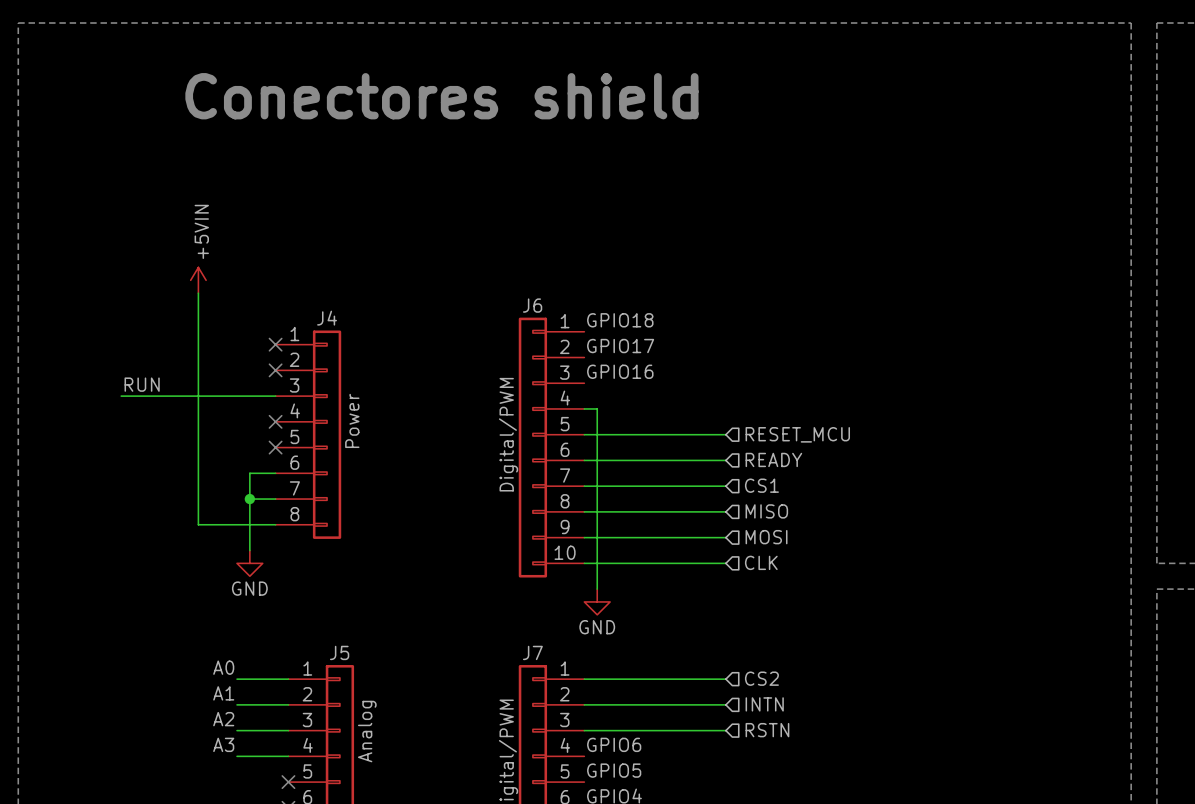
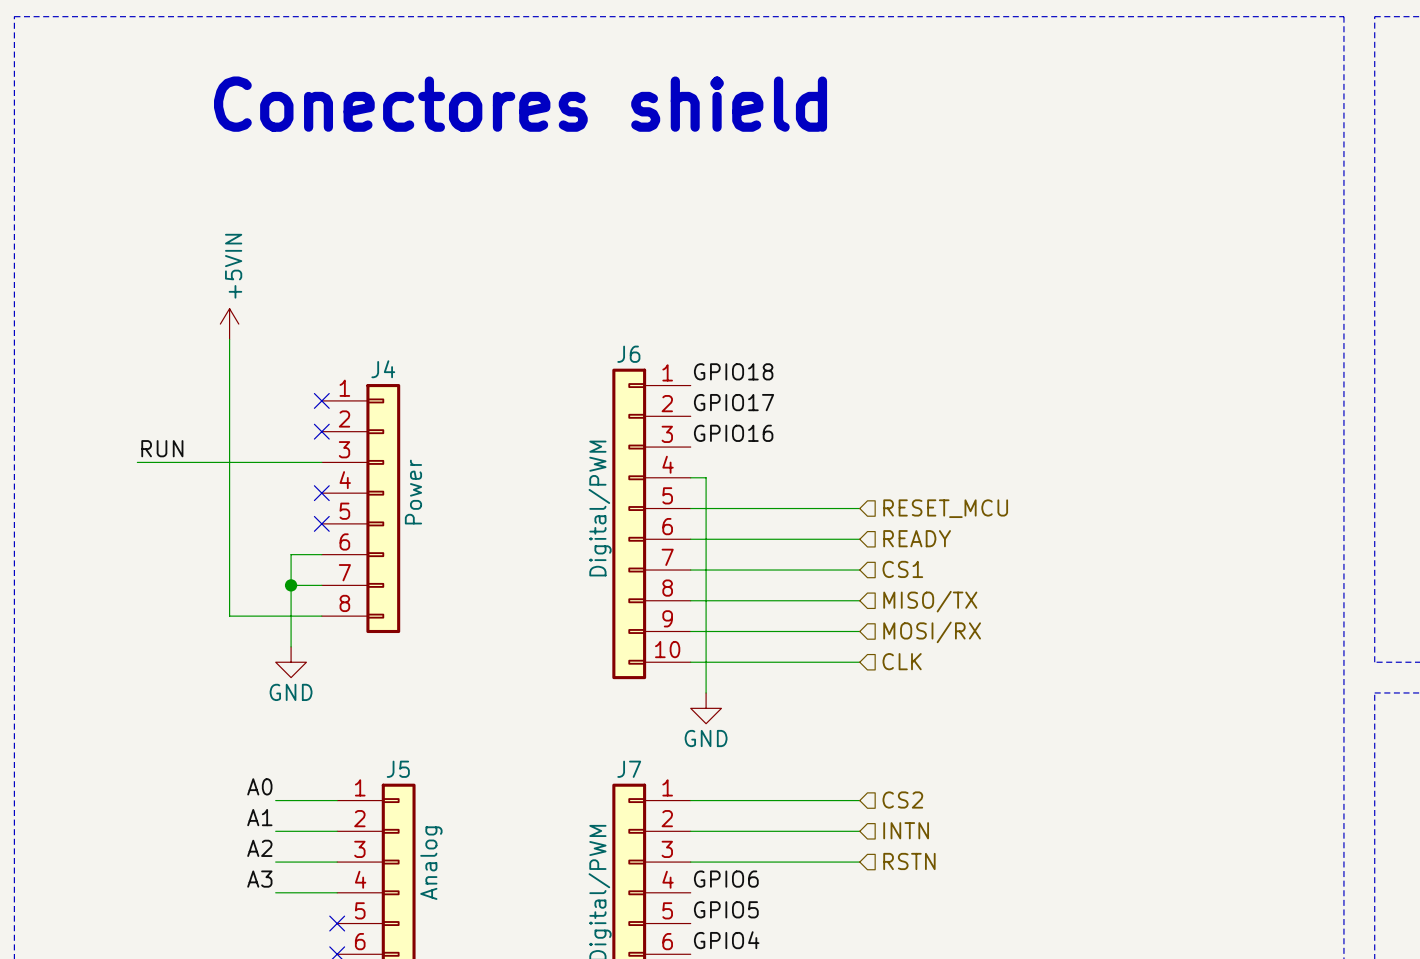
hierarchical label: MISO (766, 511) -> MISO/TX (930, 601)
hierarchical label: MOSI (766, 537) -> MOSI/RX (932, 632)

